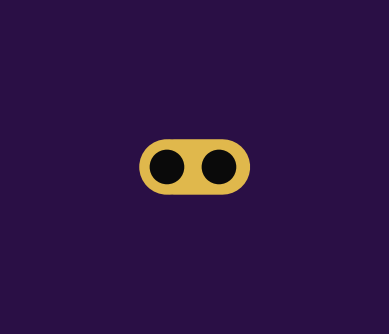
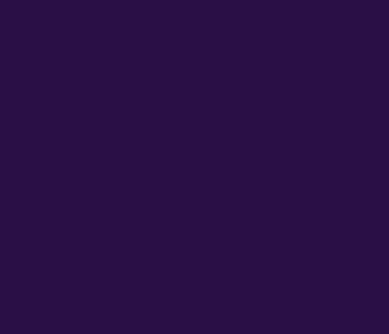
part: (194, 166) -> none

